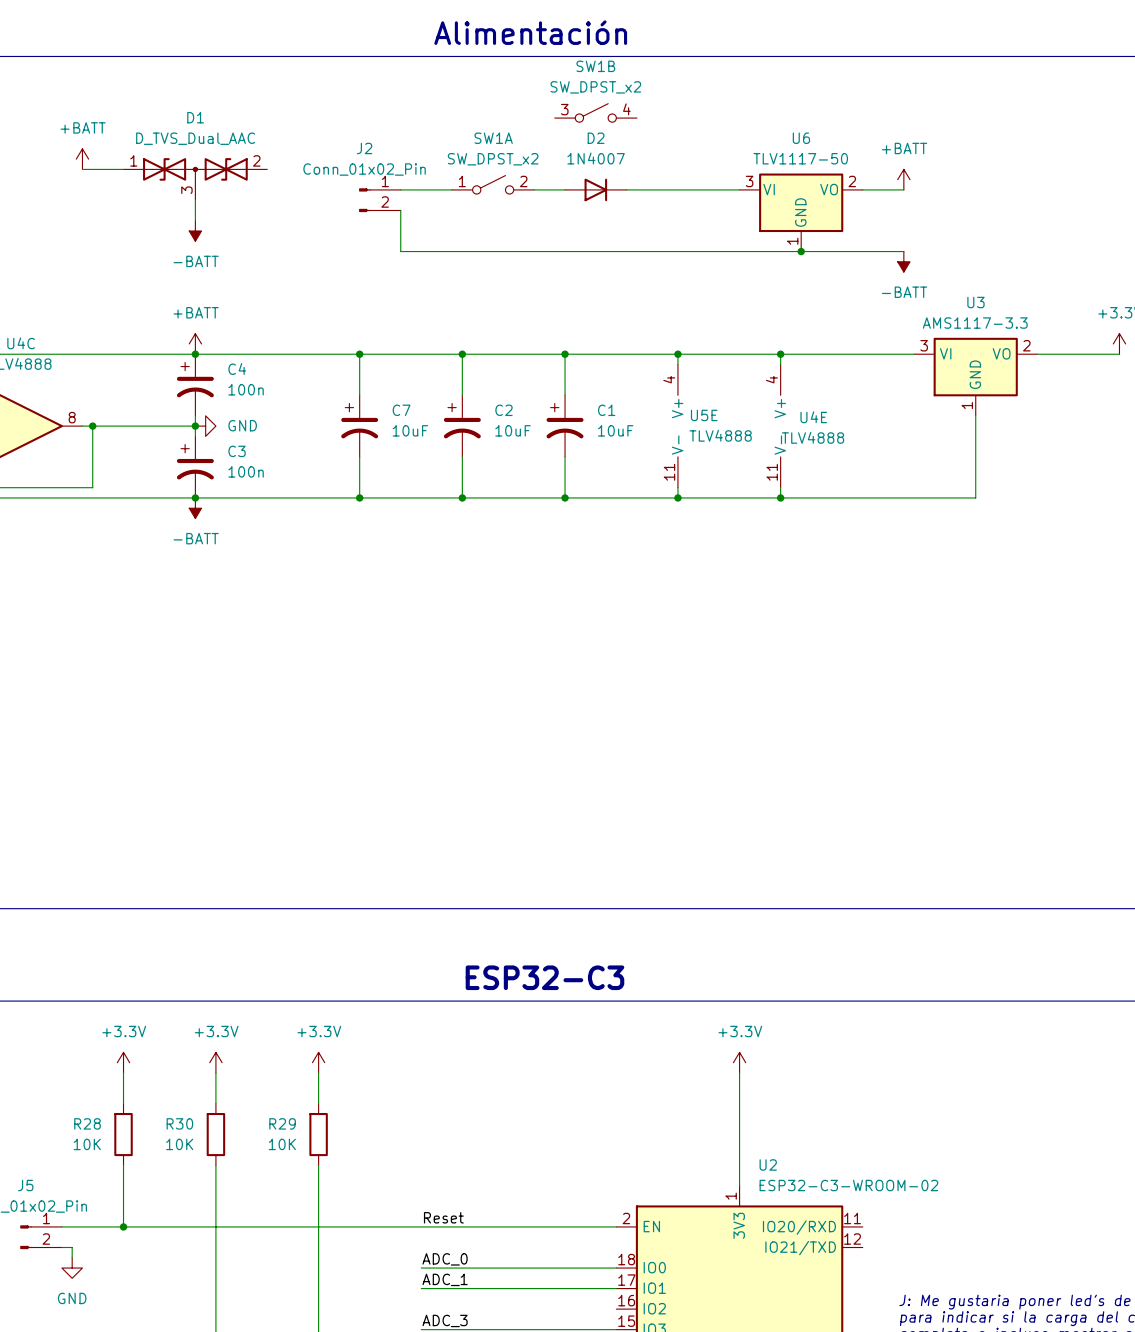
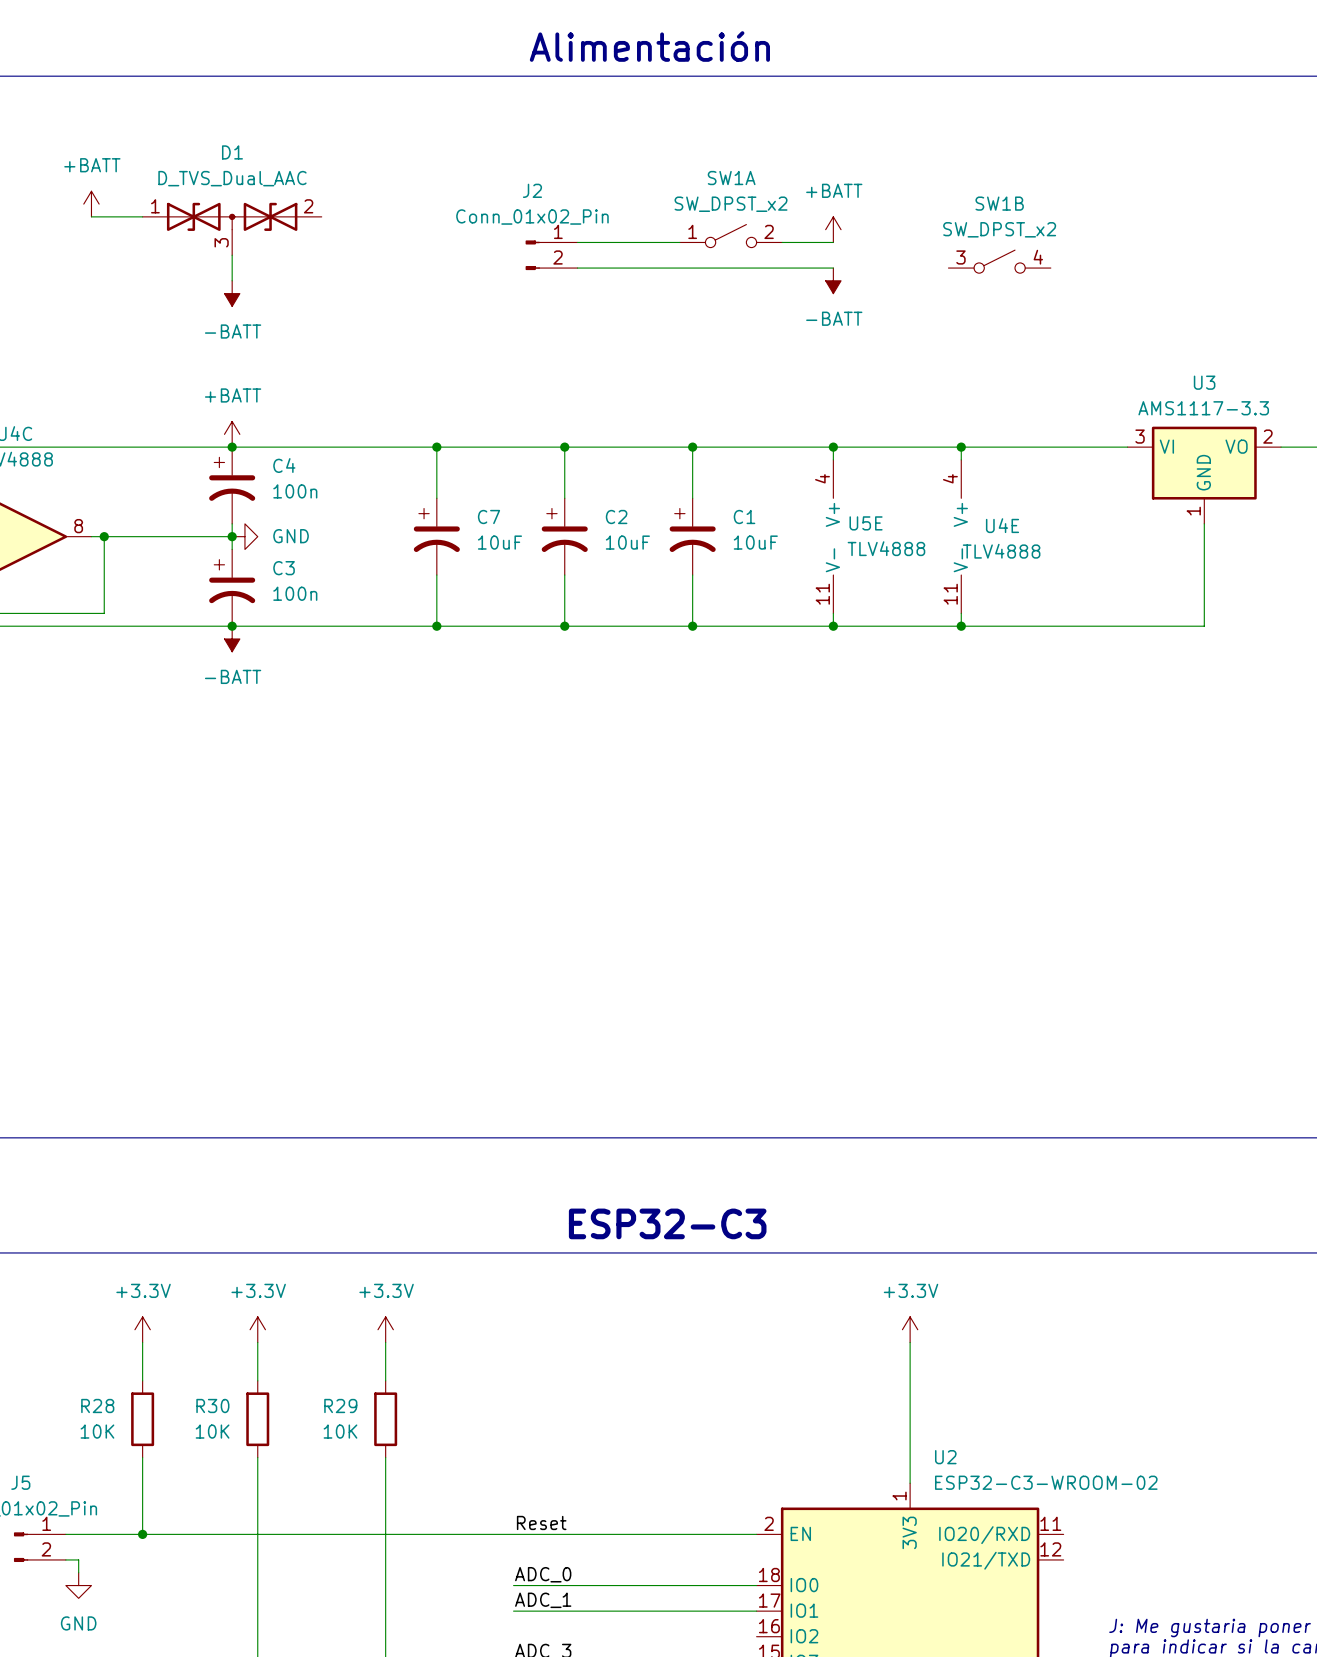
SW1B position: (595, 112) -> (999, 261)
power symbol: none -> +BATT (833, 229)
power symbol: +BATT (903, 179) -> none
SW1A position: (493, 184) -> (731, 236)
wire: (400, 189) (452, 189) -> none
wire: none -> (577, 242) (654, 242)
D2: 1N4007 (595, 189) -> none
wire: (677, 189) (739, 189) -> none
wire: (862, 189) (903, 189) -> none
J2 position: (379, 200) -> (551, 255)
wire: (400, 210) (400, 251) (903, 251) -> none
wire: none -> (577, 268) (833, 268)
U6: TLV1117-50 (801, 212) -> none
power symbol: none -> -BATT (833, 280)
junction: (801, 251) -> none
power symbol: -BATT (903, 261) -> none

